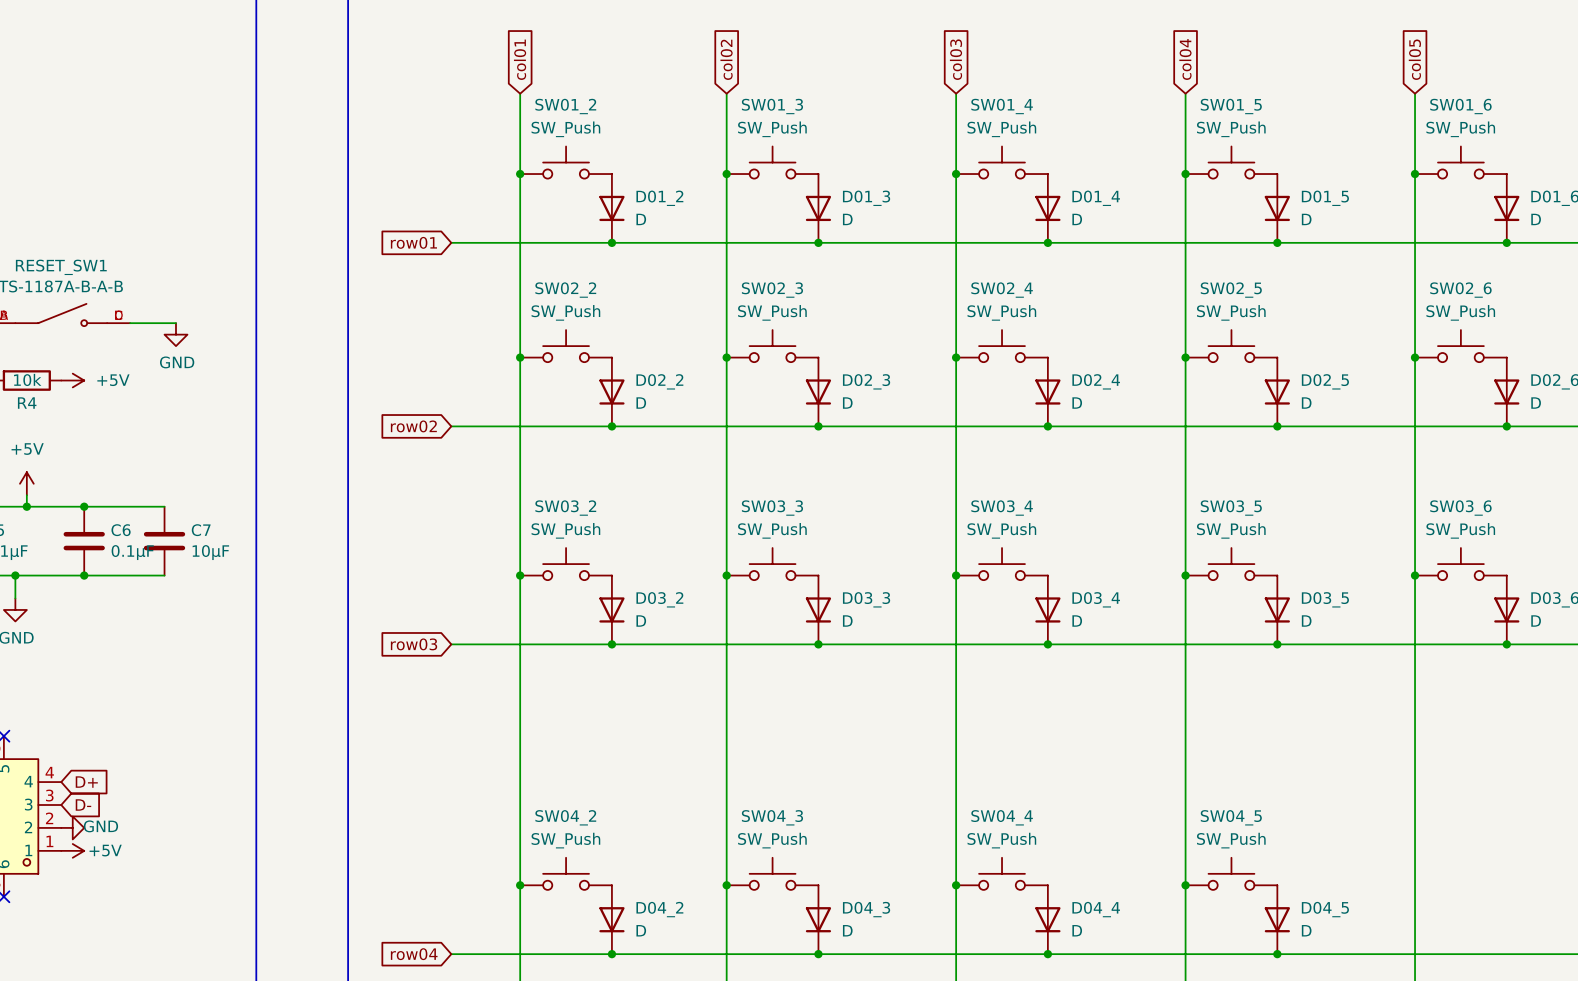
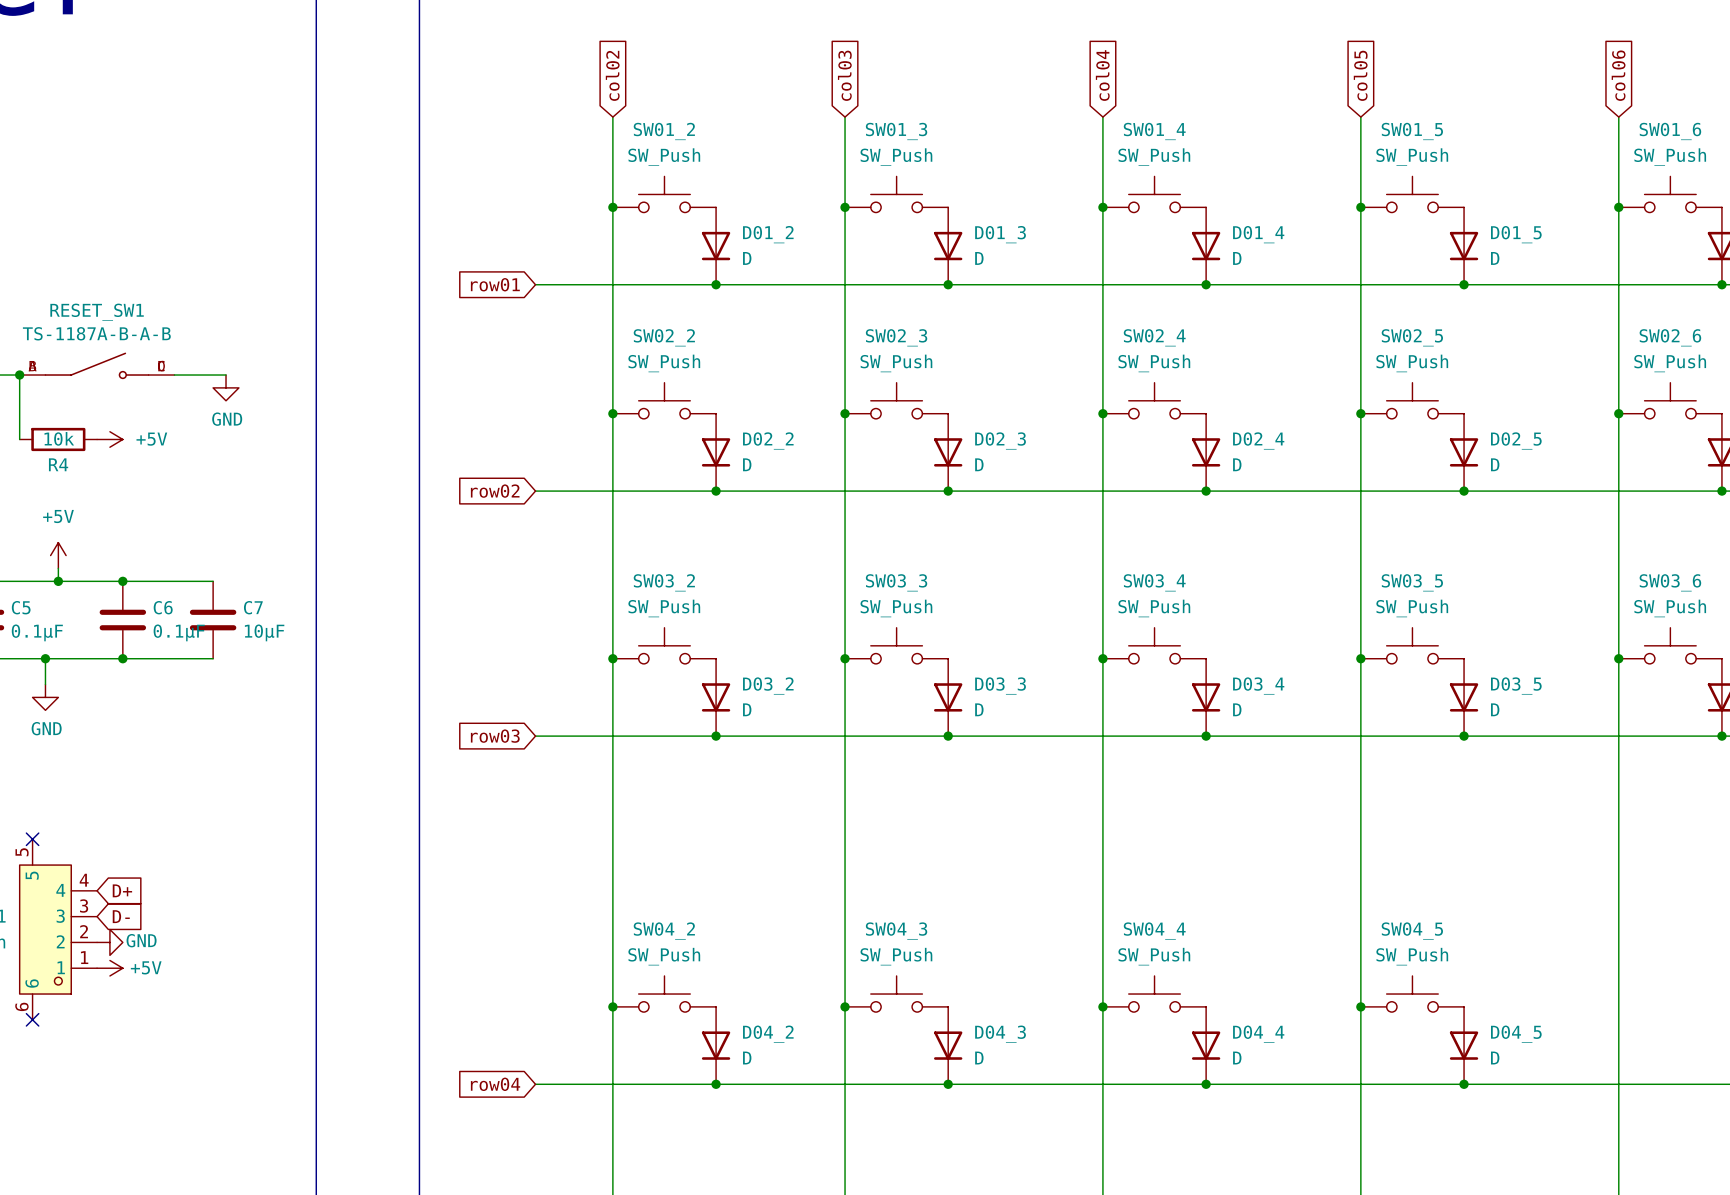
global label: col01 (520, 59) -> col02 (612, 75)
global label: col02 (726, 59) -> col03 (844, 75)
global label: col03 (955, 59) -> col04 (1102, 75)
global label: col04 (1185, 59) -> col05 (1360, 75)
global label: col05 (1414, 59) -> col06 (1618, 75)

